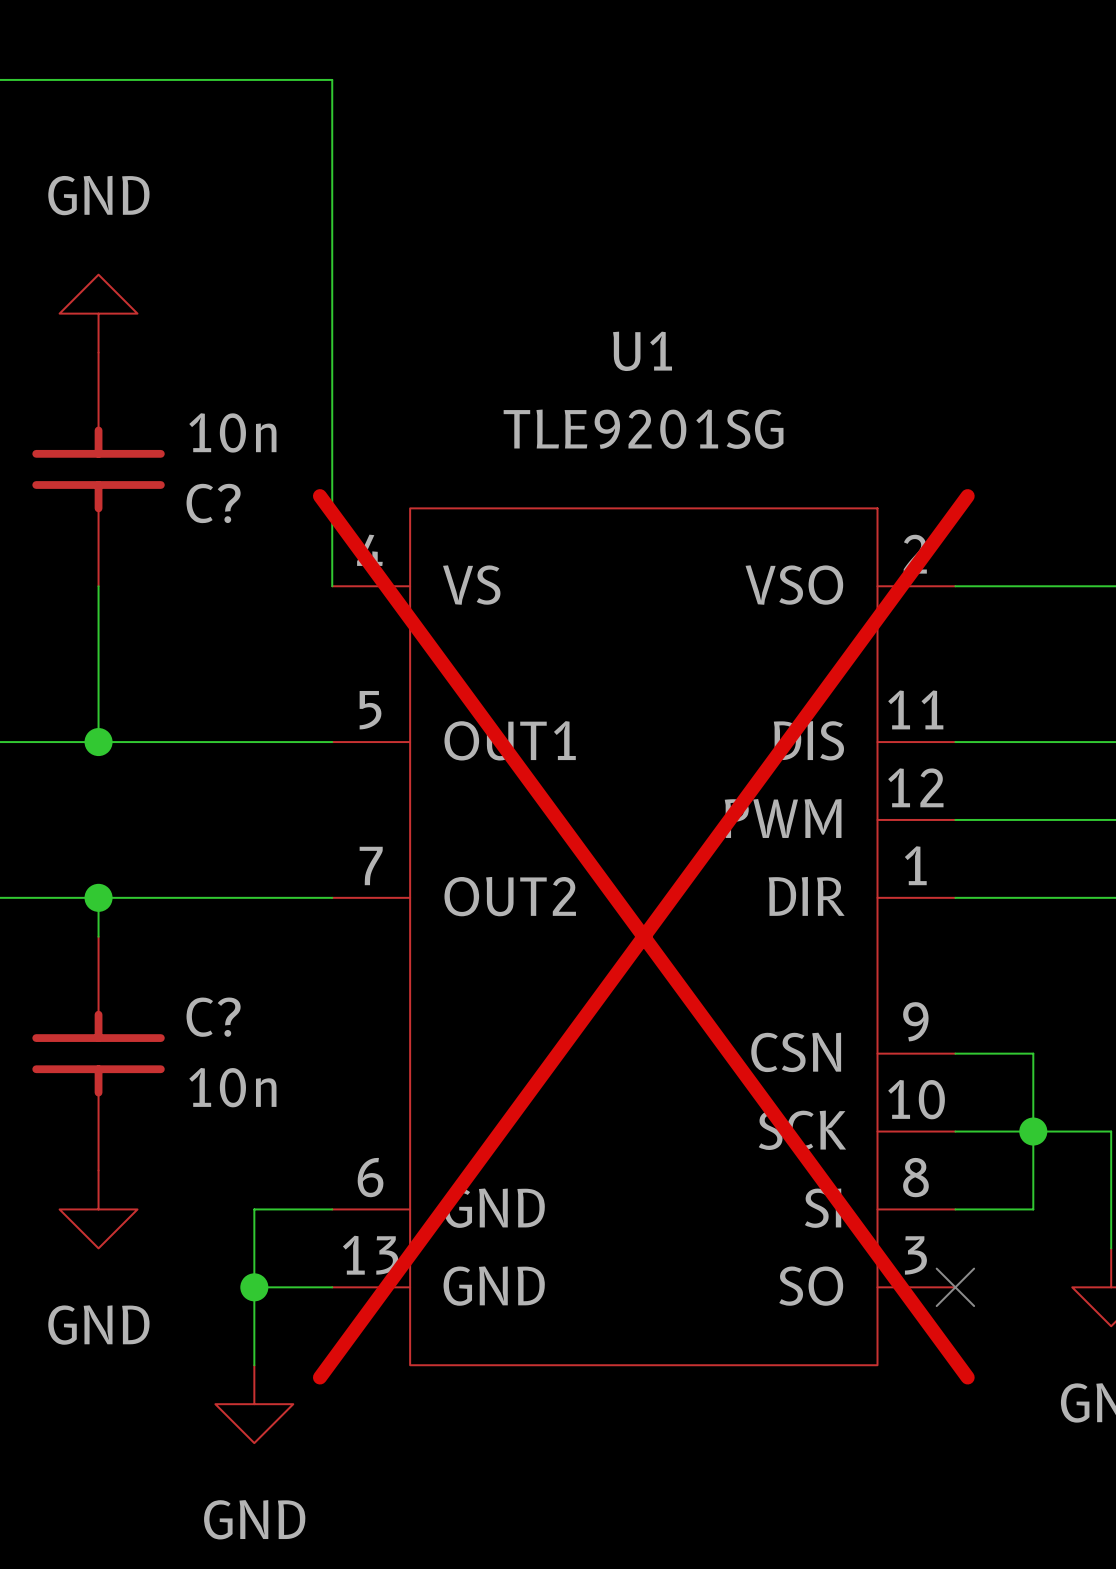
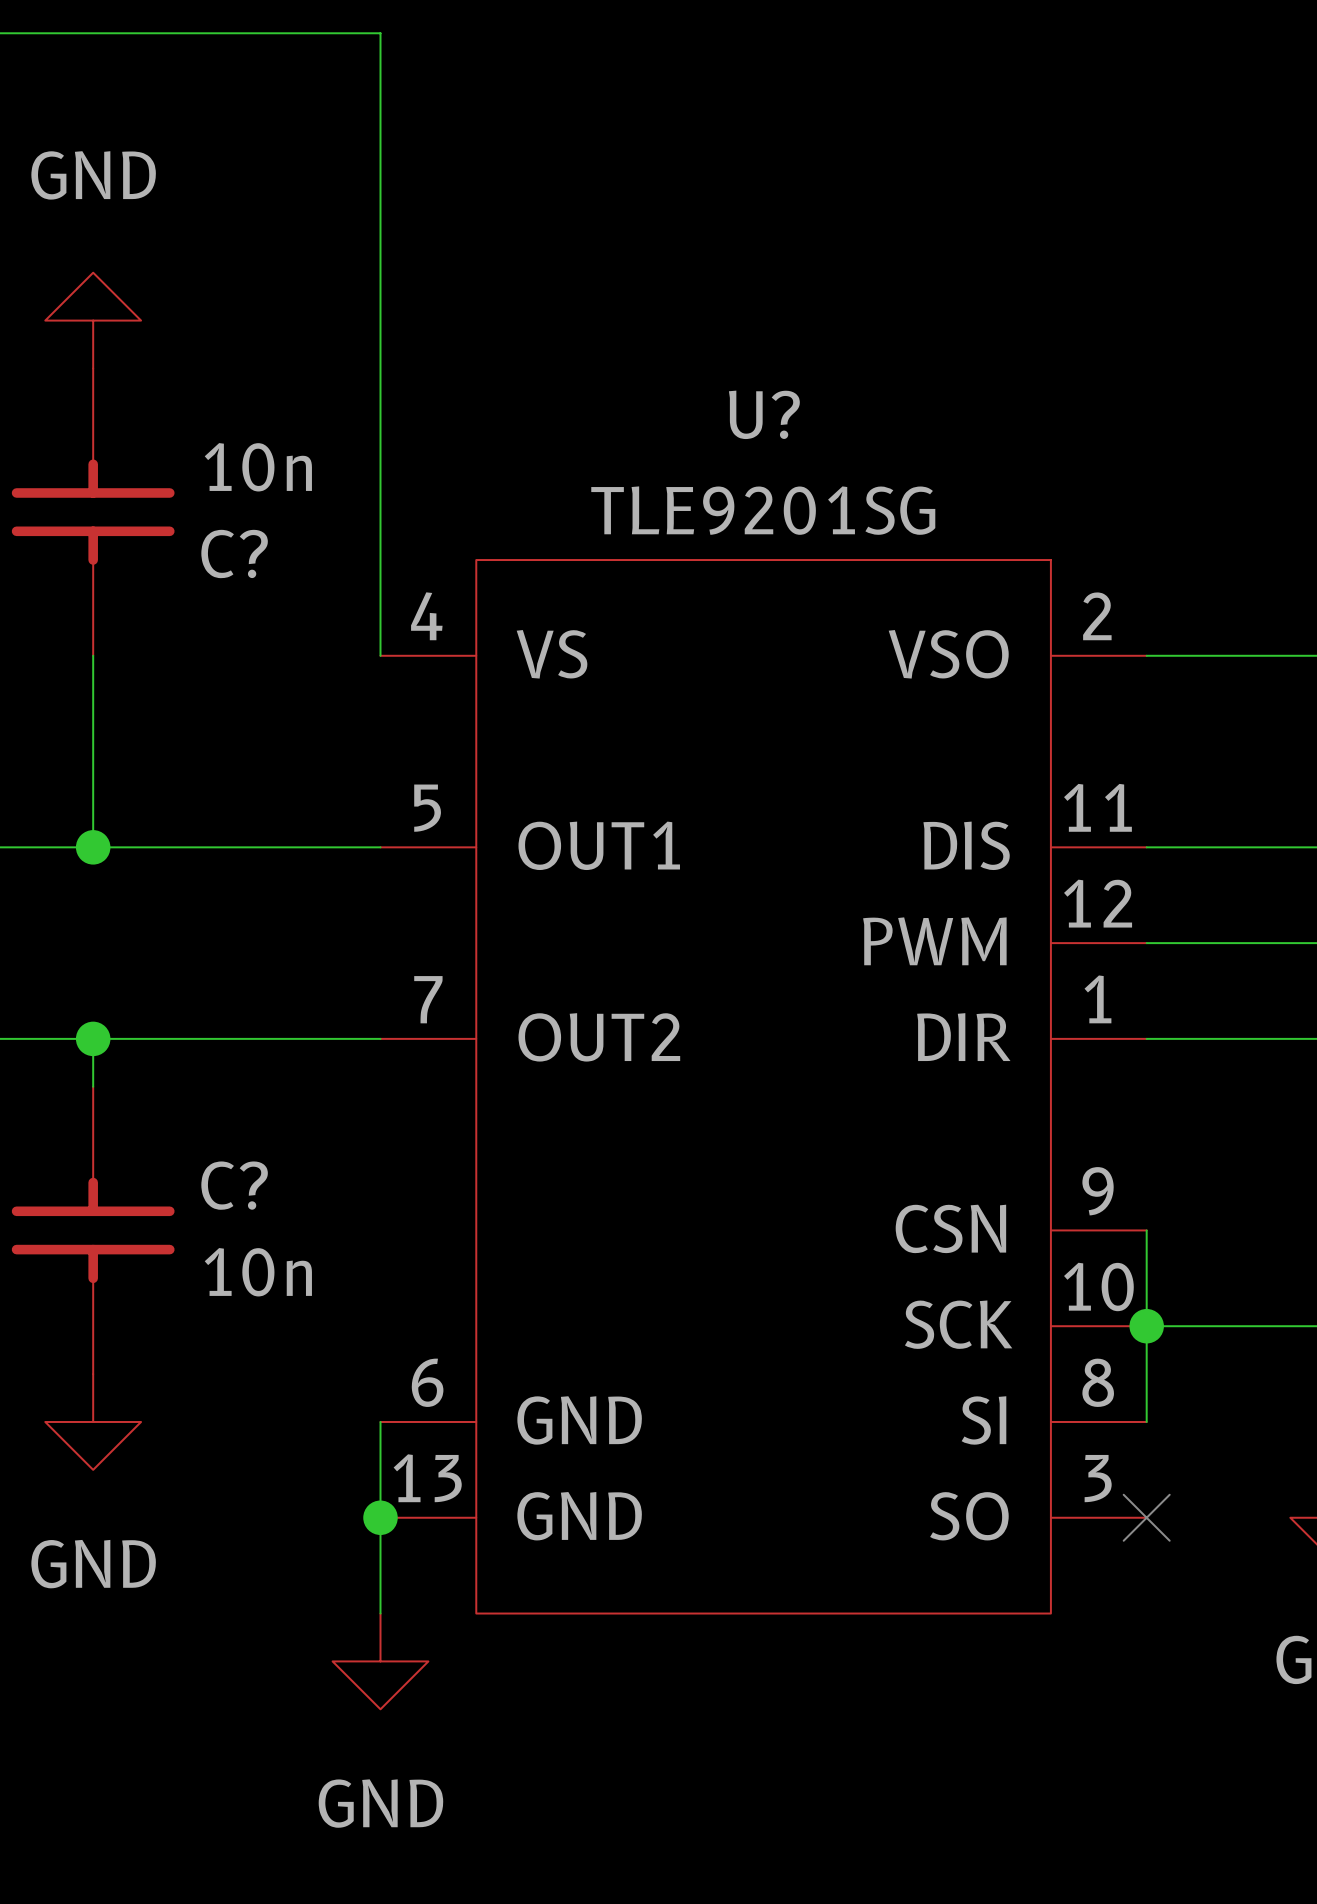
U1 name: U1 (642, 351) -> U? (764, 414)
U1 value position: TLE9201SG (643, 429) -> TLE9201SG (763, 510)
U1 do-not-place cross: (643, 936) -> none
wire: (955, 1053) (1033, 1053) (1033, 1209) (955, 1209) -> (1146, 1230) (1146, 1421)
junction position: (1033, 1131) -> (1146, 1326)
wire: (332, 1209) (254, 1209) (254, 1365) -> (380, 1421) (380, 1613)
wire: (254, 1287) (332, 1287) -> none
junction position: (254, 1287) -> (380, 1517)
power symbol position: GND (254, 1404) -> GND (380, 1661)

